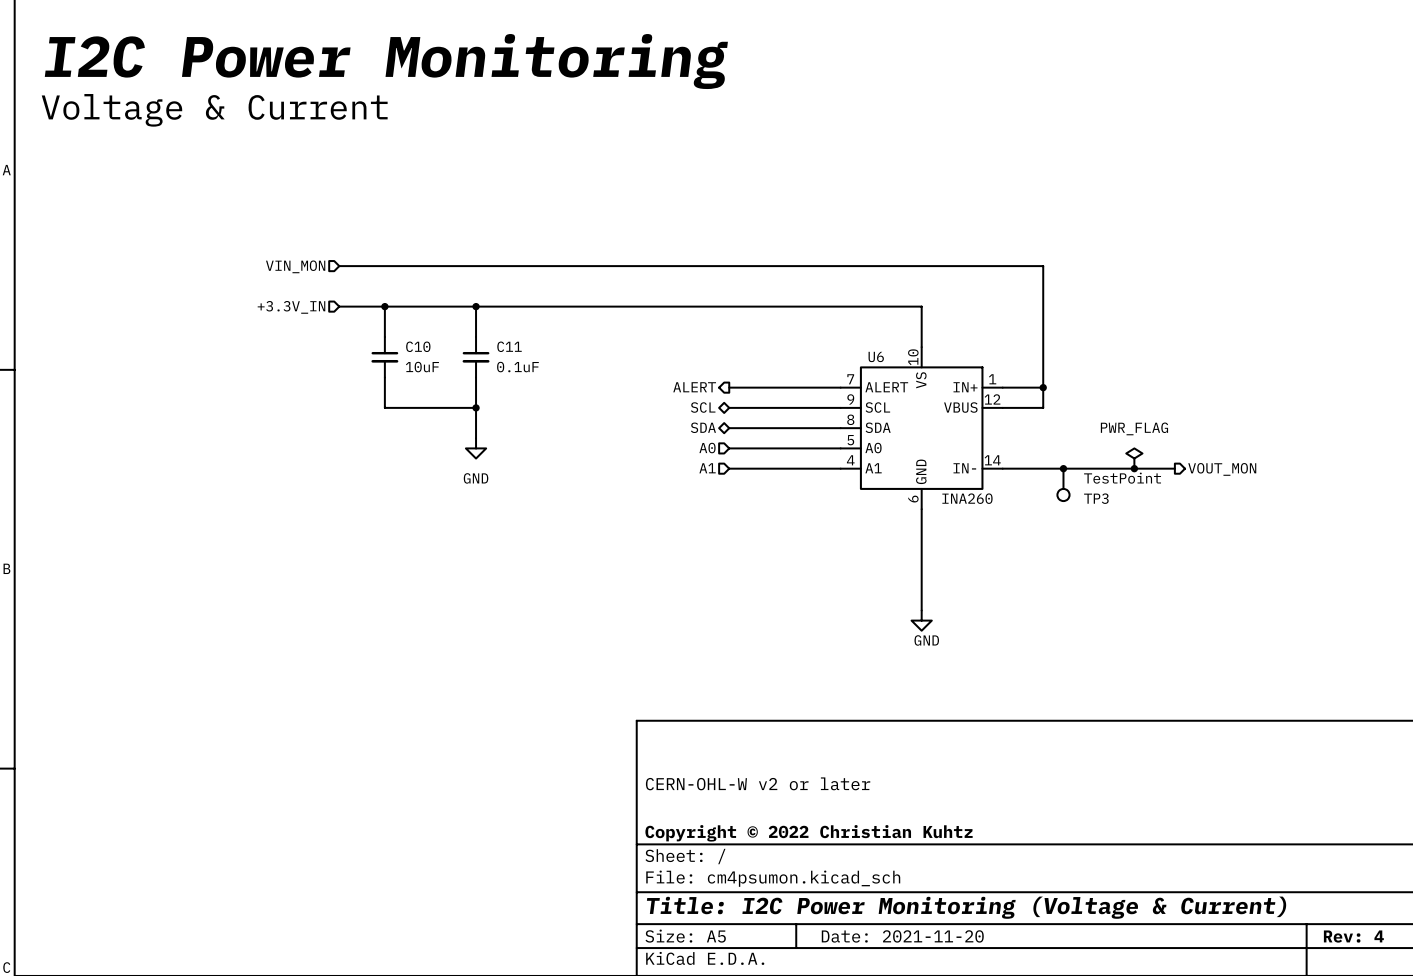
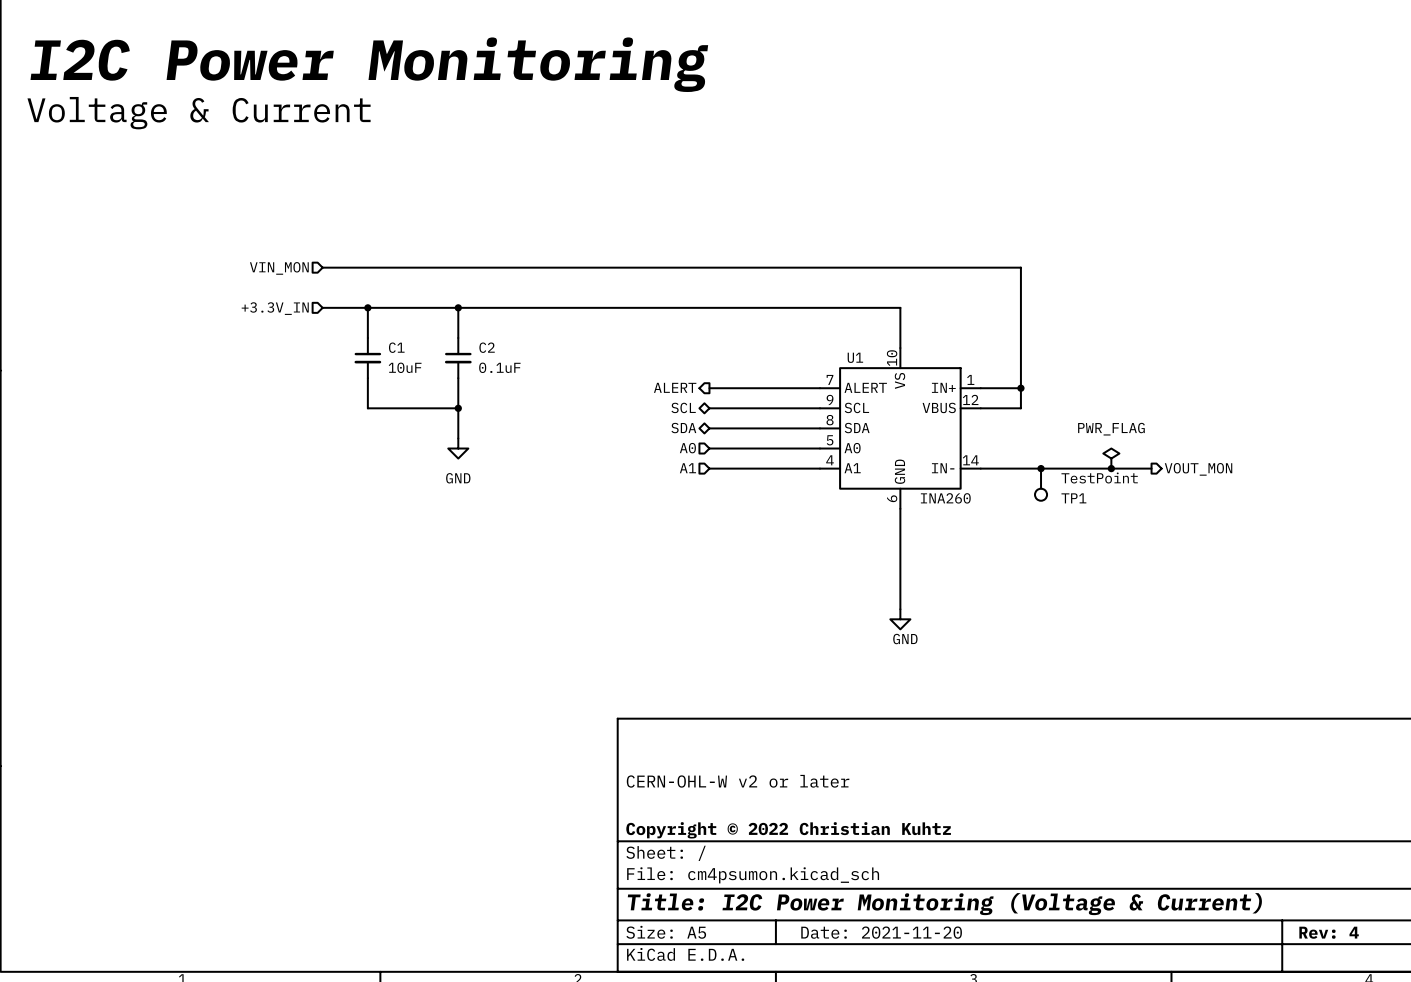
C10 name: C10 (418, 346) -> C1 (396, 347)
C11 name: C11 (509, 346) -> C2 (487, 347)
U6 name: U6 (876, 356) -> U1 (855, 357)
TP3 name: TP3 (1096, 498) -> TP1 (1073, 498)

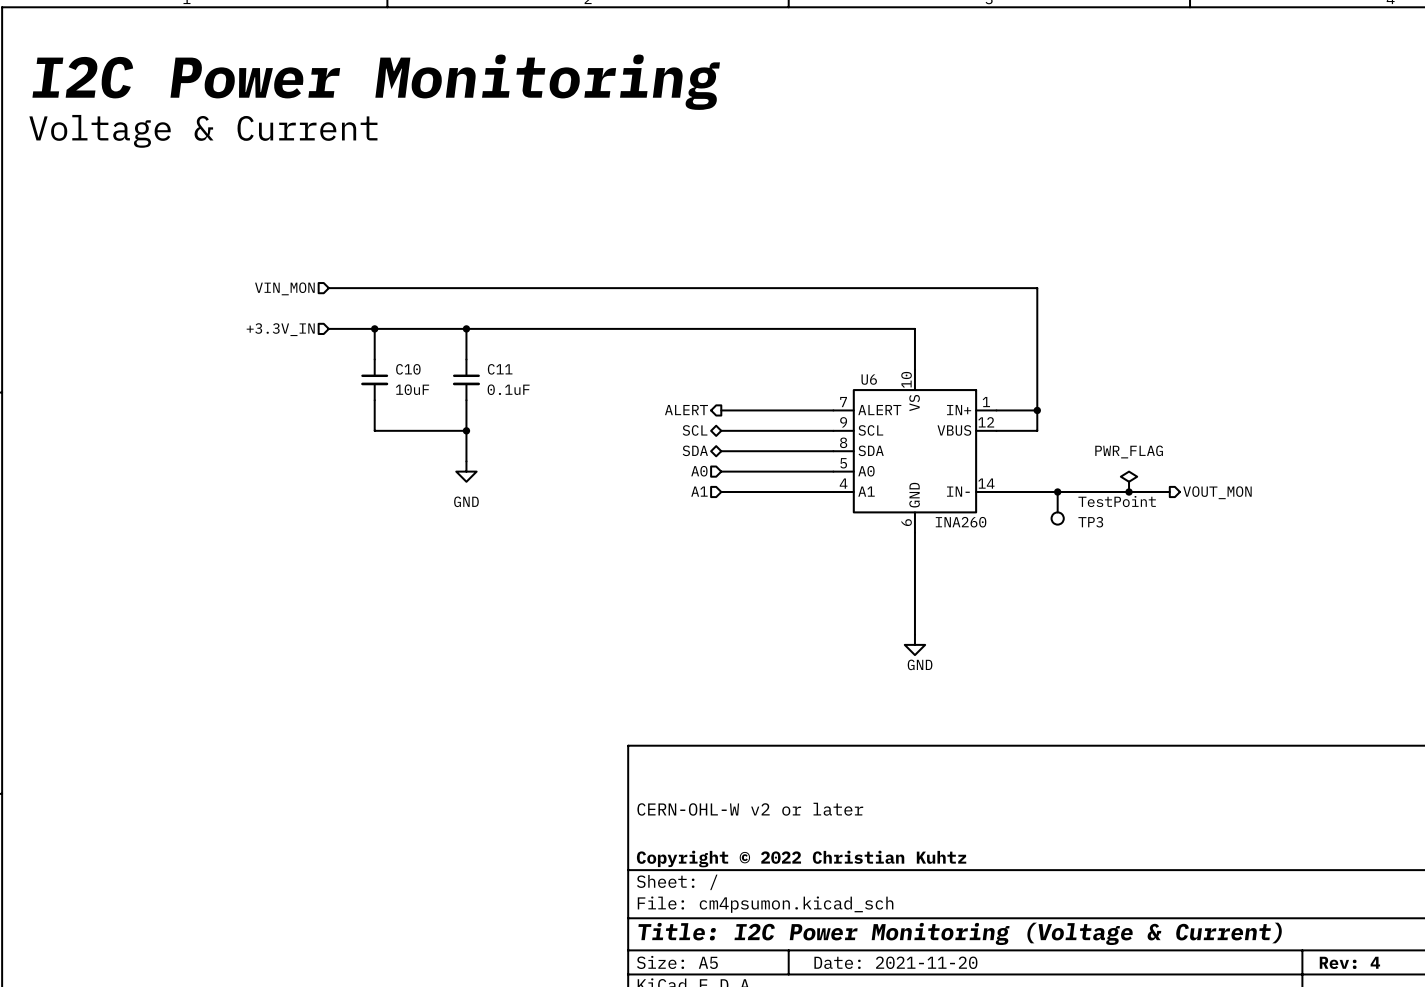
C1 name: C1 (396, 347) -> C10 (408, 369)
C2 name: C2 (487, 347) -> C11 (500, 369)
U1 name: U1 (855, 357) -> U6 (869, 379)
TP1 name: TP1 (1073, 498) -> TP3 (1090, 522)

